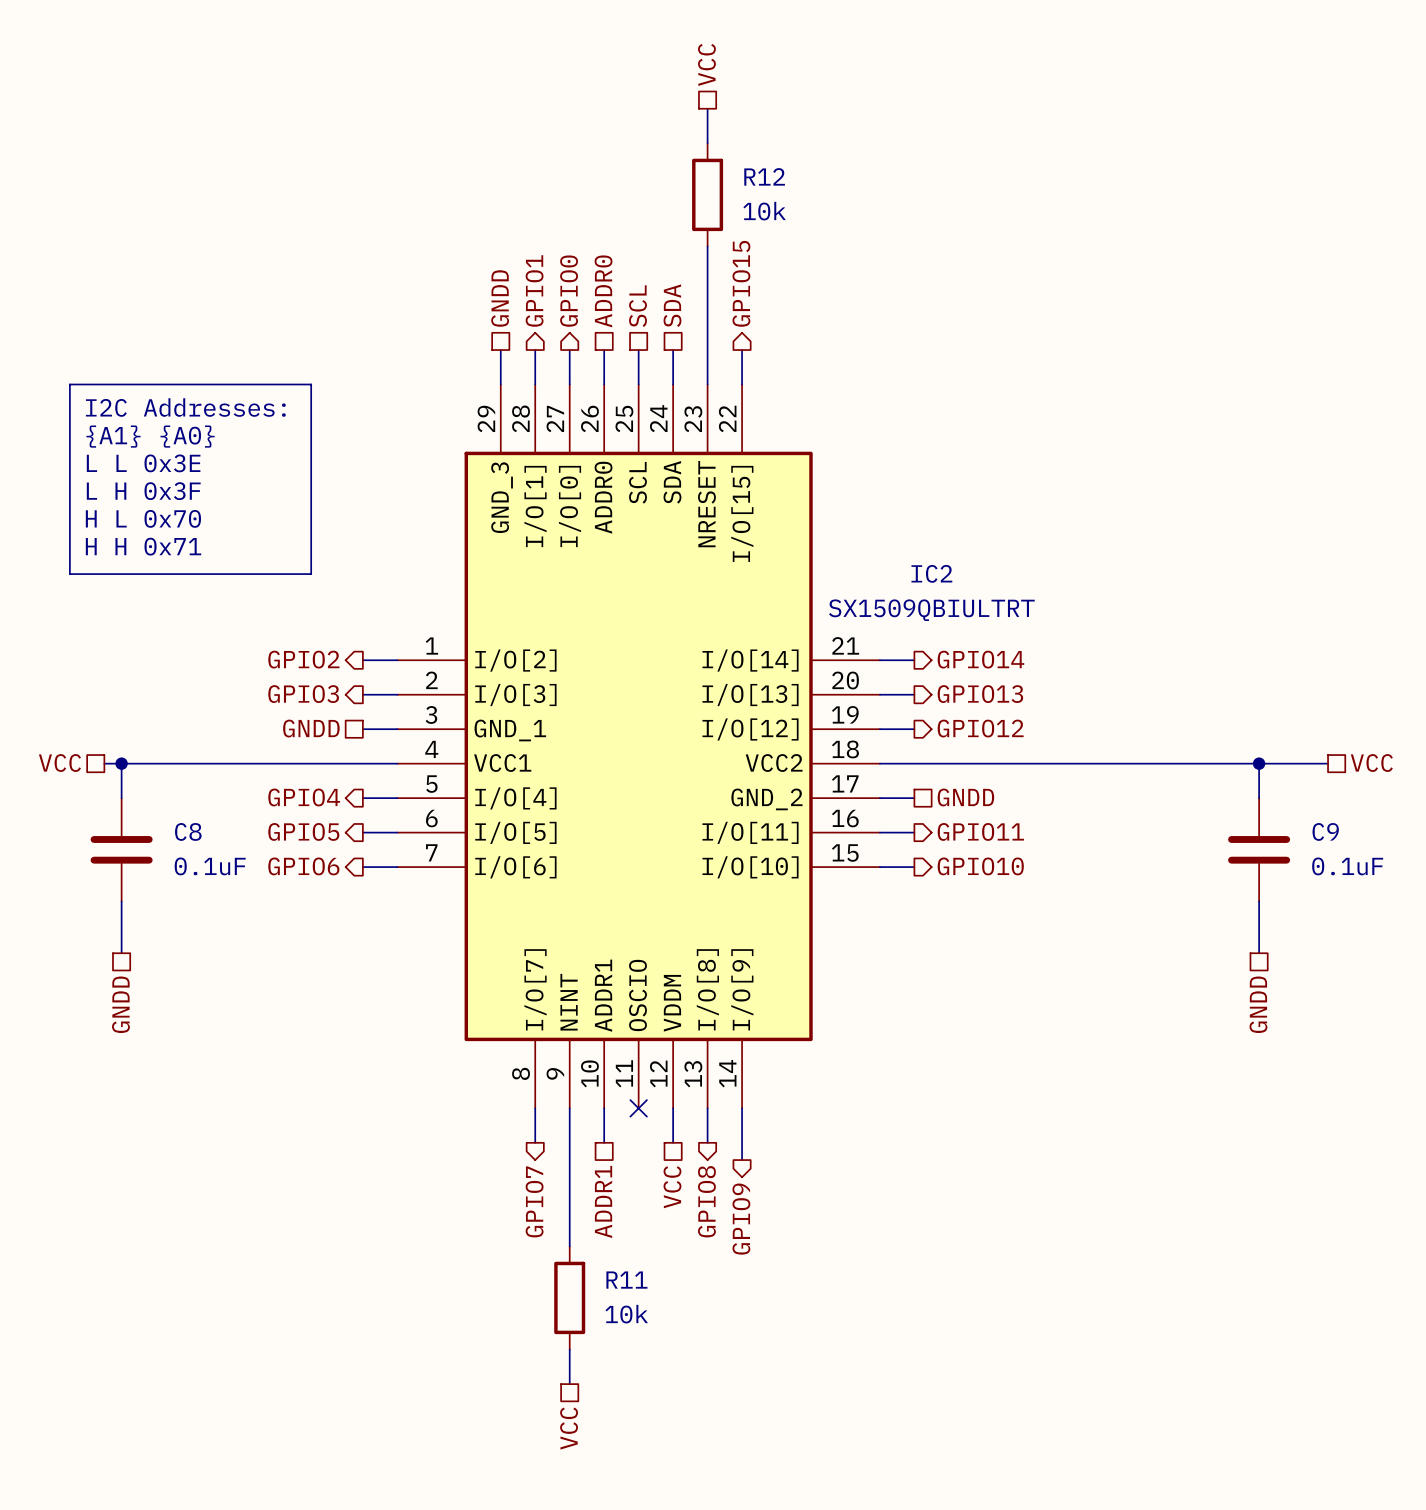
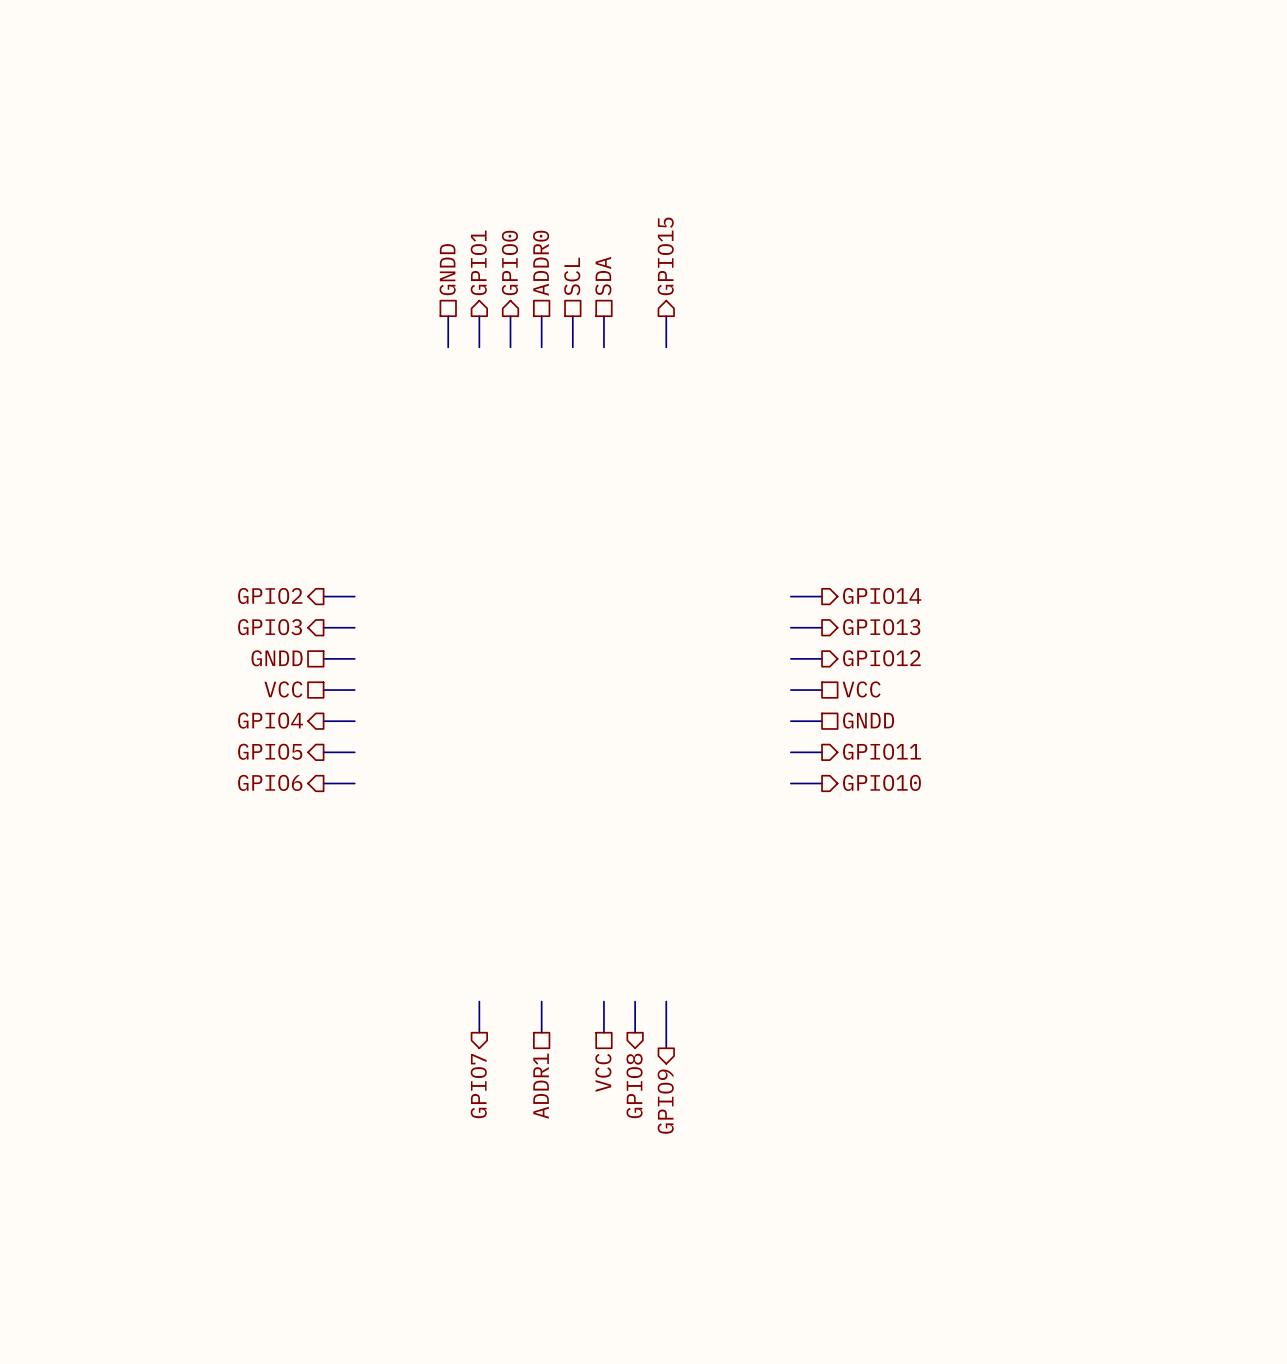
hierarchical label: VCC (706, 64) -> none
wire: (707, 108) (707, 143) -> none
R12: 10k (707, 194) -> none
wire: (707, 246) (707, 384) -> none
line: (69, 384) (311, 384) (311, 574) (69, 574) (69, 384) -> none
text: I2C Addresses: (185, 407) -> none
text: {A1} {A0} (150, 436) -> none
text: L L 0x3E (143, 463) -> none
text: L H 0x3F (143, 491) -> none
text: H L 0x70 (143, 518) -> none
text: H H 0x71 (143, 546) -> none
IC2: SX1509QBIULTRT (638, 746) -> none
hierarchical label position: VCC (59, 763) -> VCC (283, 689)
wire: (104, 763) (362, 763) -> none
wire: (121, 763) (121, 798) -> none
junction: (121, 763) -> none
wire: (914, 763) (1328, 763) -> none
hierarchical label: none -> VCC (861, 689)
wire: (1259, 763) (1259, 798) -> none
junction: (1259, 763) -> none
hierarchical label: VCC (1371, 763) -> none
C8: 0.1uF (121, 849) -> none
C9: 0.1uF (1259, 849) -> none
wire: (121, 901) (121, 953) -> none
wire: (1259, 901) (1259, 953) -> none
hierarchical label: GNDD (120, 1004) -> none
hierarchical label: GNDD (1258, 1004) -> none
wire: (569, 1108) (569, 1246) -> none
no-connect mark: (638, 1108) -> none
R11: 10k (569, 1297) -> none
wire: (569, 1349) (569, 1384) -> none
hierarchical label: VCC (569, 1428) -> none

